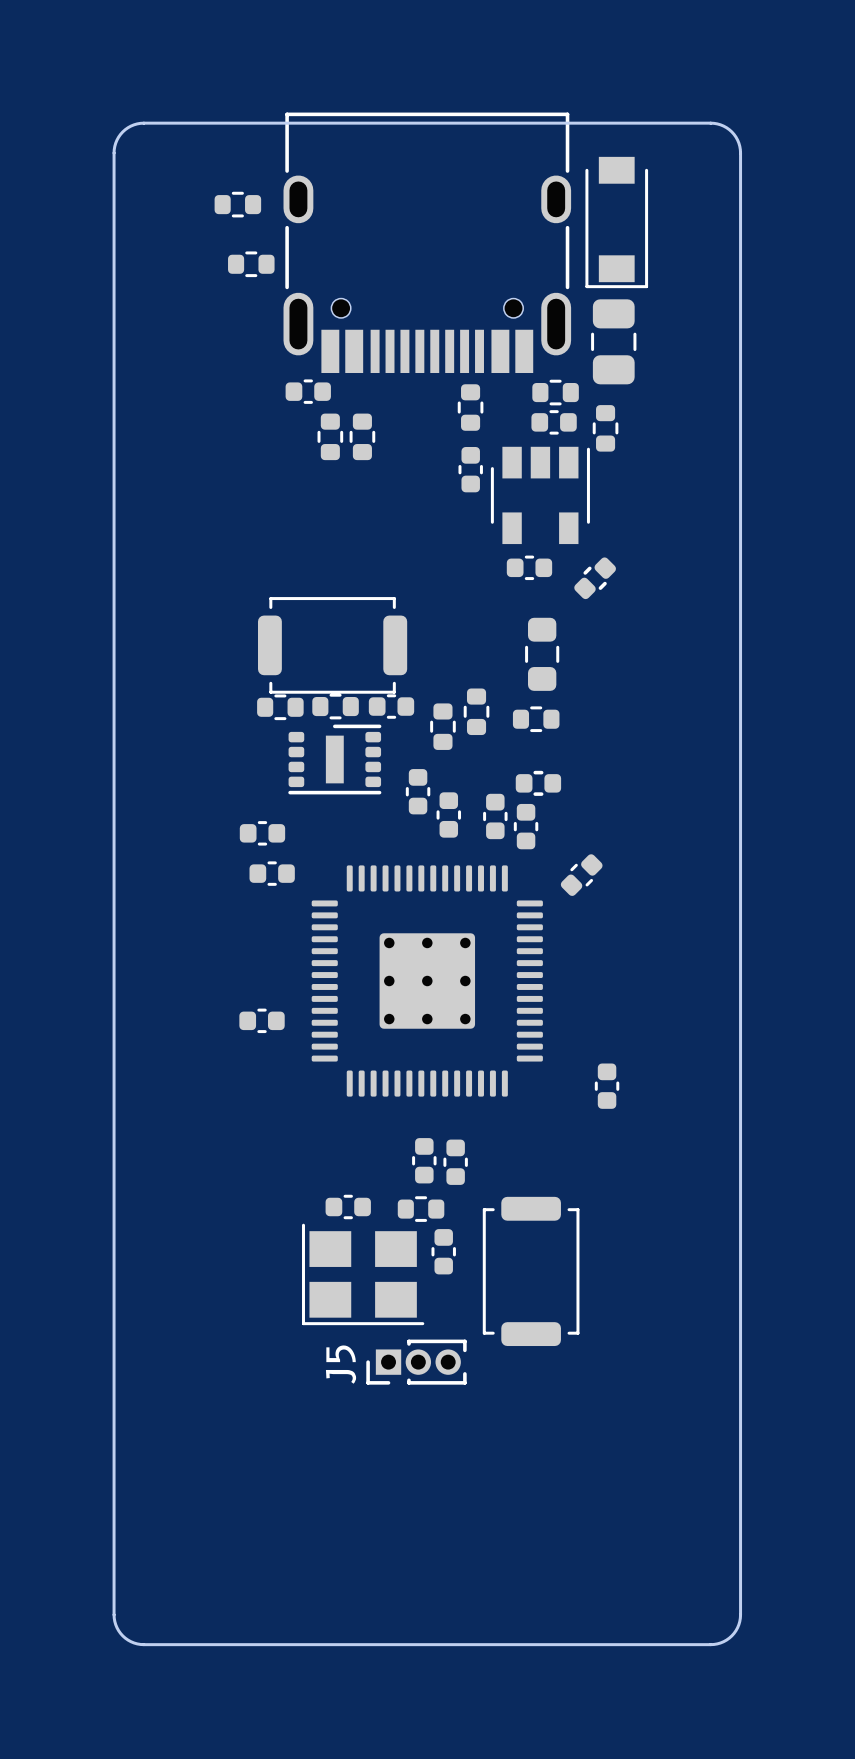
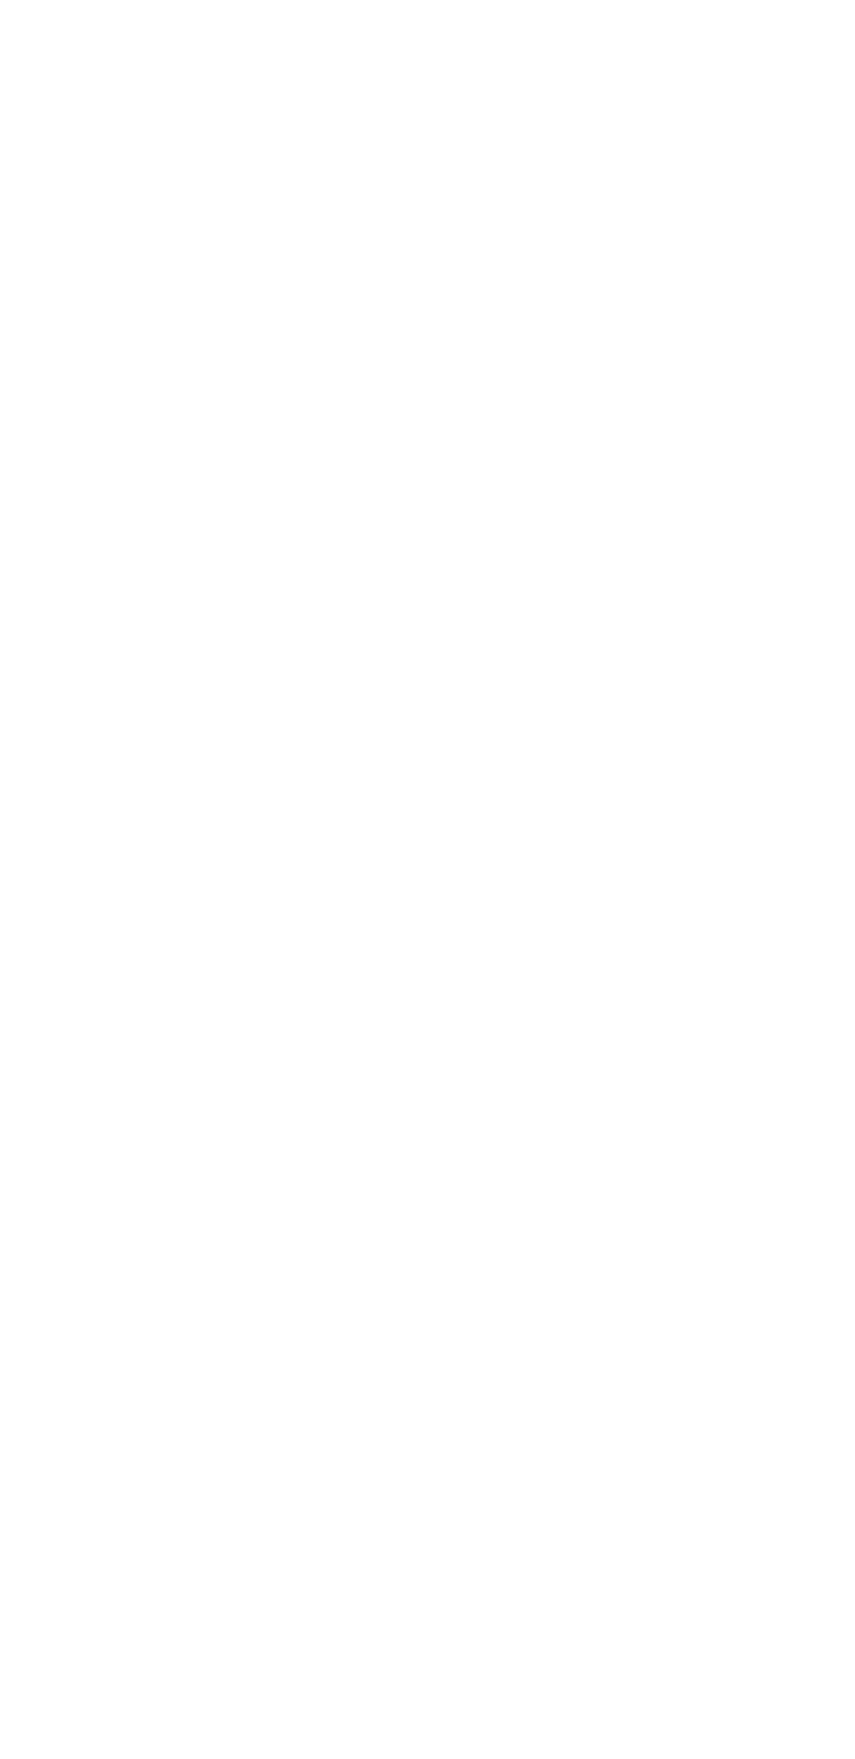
board edge: (143, 123) (710, 123) (720, 124) (729, 129) (738, 143) (740, 152) (740, 1614) (738, 1624) (734, 1633) (720, 1642) (710, 1644) (143, 1644) (134, 1642) (125, 1638) (115, 1624) (114, 1614) (114, 152) (115, 143) (122, 131) (130, 126) (143, 123) -> none
part: (237, 204) -> none
part: (616, 222) -> none
part: (427, 242) -> none
part: (251, 264) -> none
part: (613, 341) -> none
part: (308, 391) -> none
part: (555, 392) -> none
part: (470, 407) -> none
part: (554, 422) -> none
part: (605, 428) -> none
part: (330, 436) -> none
part: (362, 436) -> none
part: (470, 469) -> none
part: (540, 495) -> none
part: (529, 567) -> none
part: (595, 578) -> none
part: (332, 645) -> none
part: (542, 654) -> none
part: (335, 706) -> none
part: (391, 706) -> none
part: (280, 707) -> none
part: (476, 711) -> none
part: (536, 719) -> none
part: (442, 726) -> none
part: (334, 759) -> none
part: (538, 783) -> none
part: (418, 791) -> none
part: (448, 814) -> none
part: (495, 816) -> none
part: (526, 826) -> none
part: (262, 833) -> none
part: (272, 873) -> none
part: (581, 875) -> none
part: (427, 981) -> none
part: (262, 1020) -> none
part: (607, 1086) -> none
part: (424, 1160) -> none
part: (455, 1162) -> none
part: (348, 1206) -> none
part: (421, 1209) -> none
part: (443, 1251) -> none
part: (531, 1271) -> none
part: (363, 1274) -> none
J5: (416, 1362) -> none

